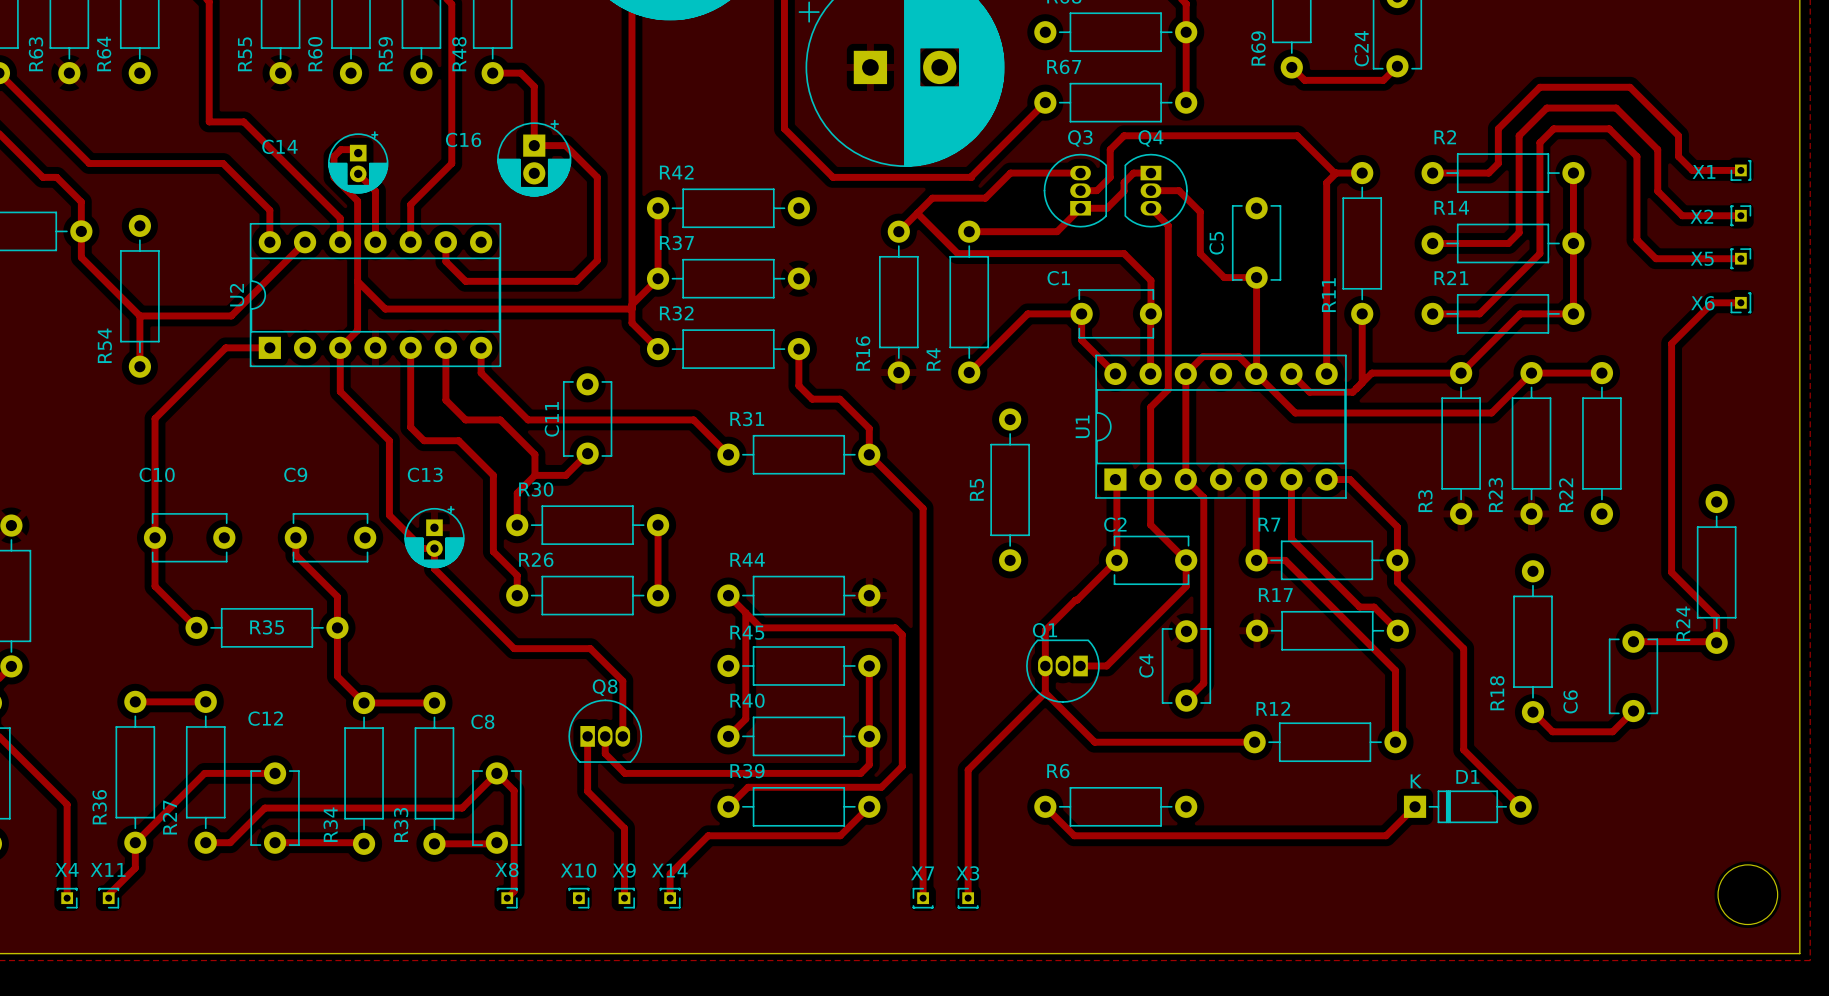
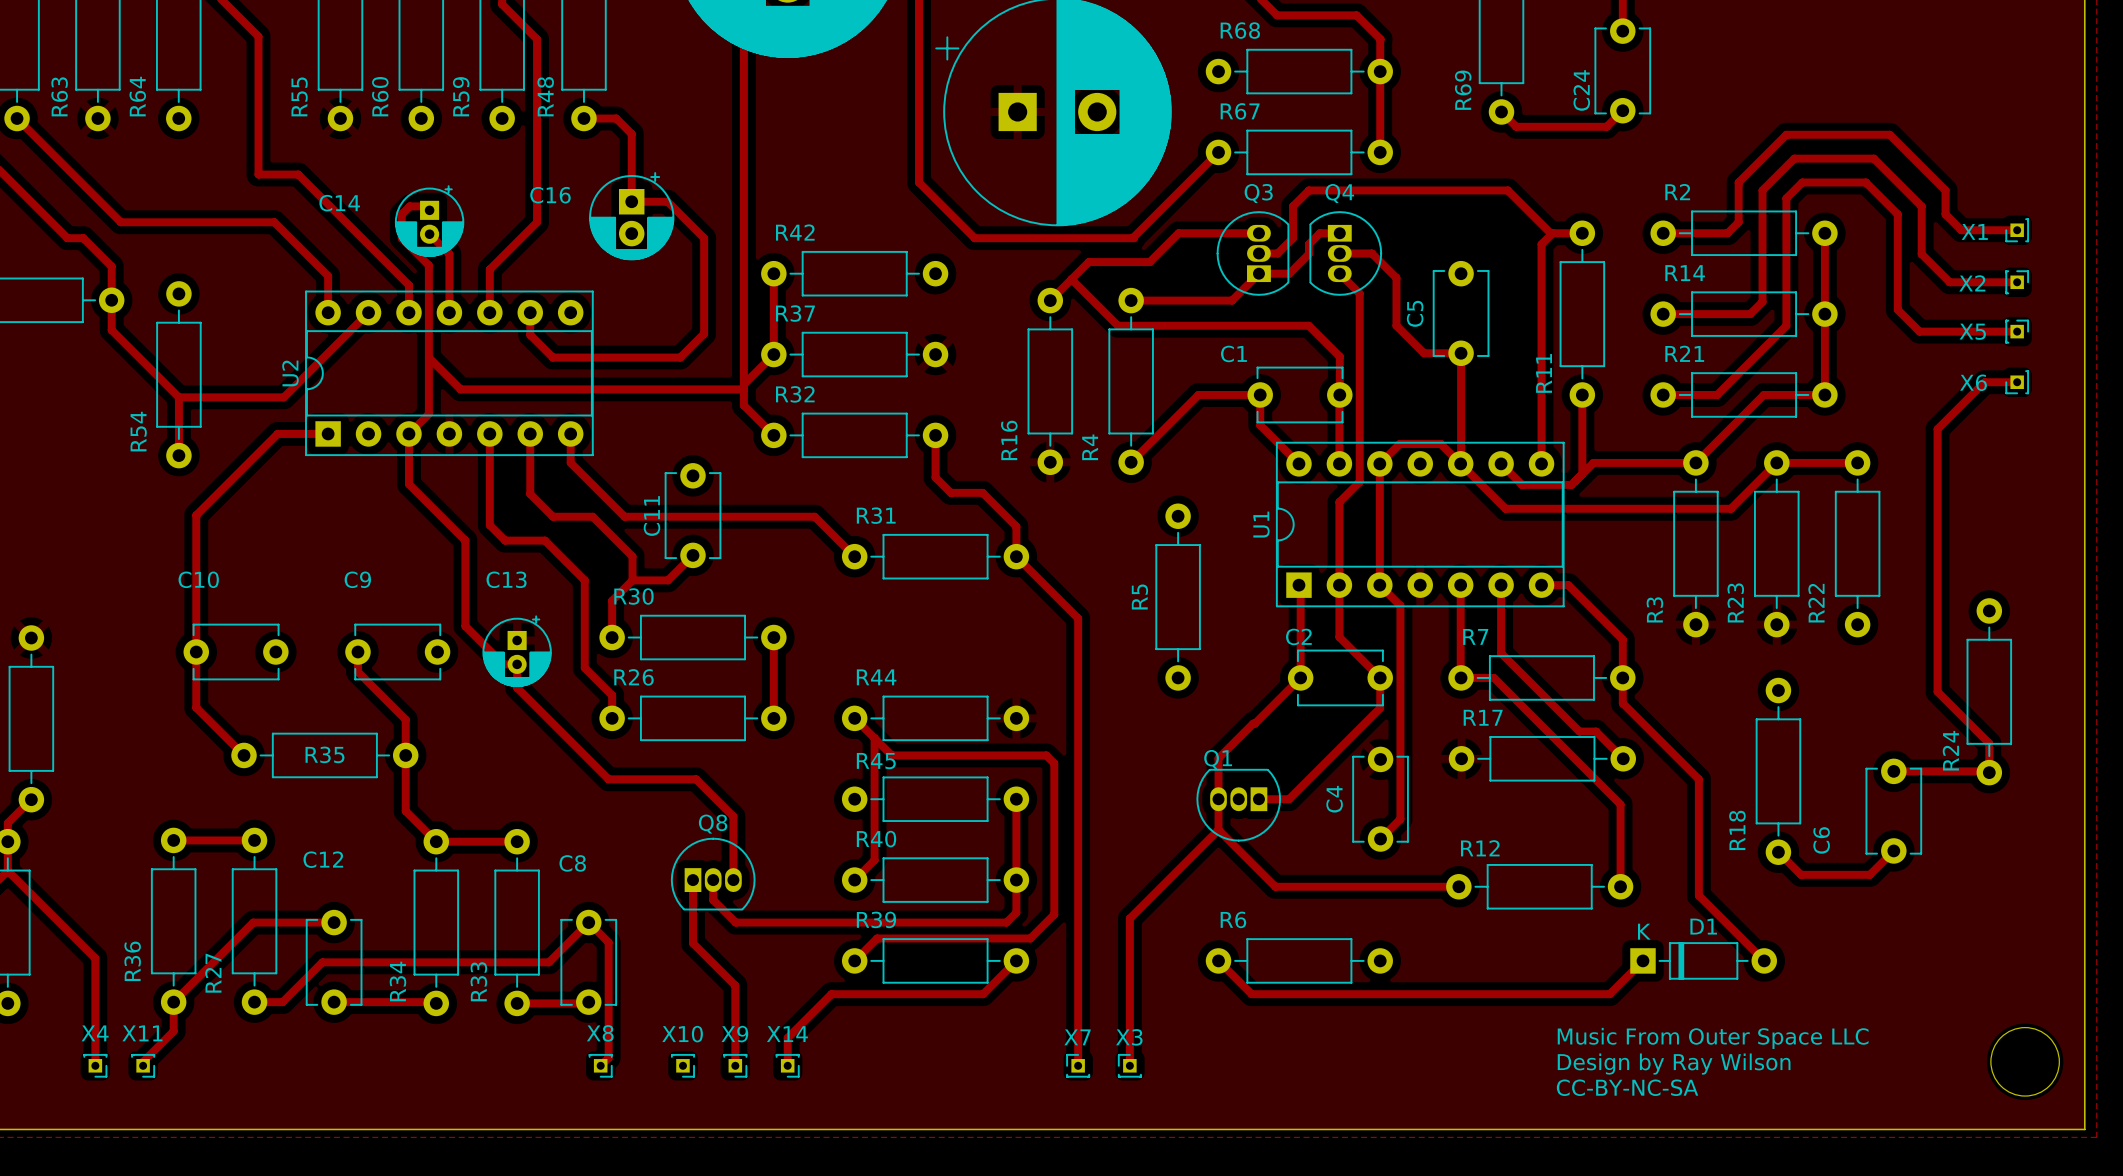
text: none -> Music From Outer Space LLC (1713, 1038)
text: none -> Design by Ray Wilson (1674, 1064)
text: none -> CC-BY-NC-SA (1627, 1087)

